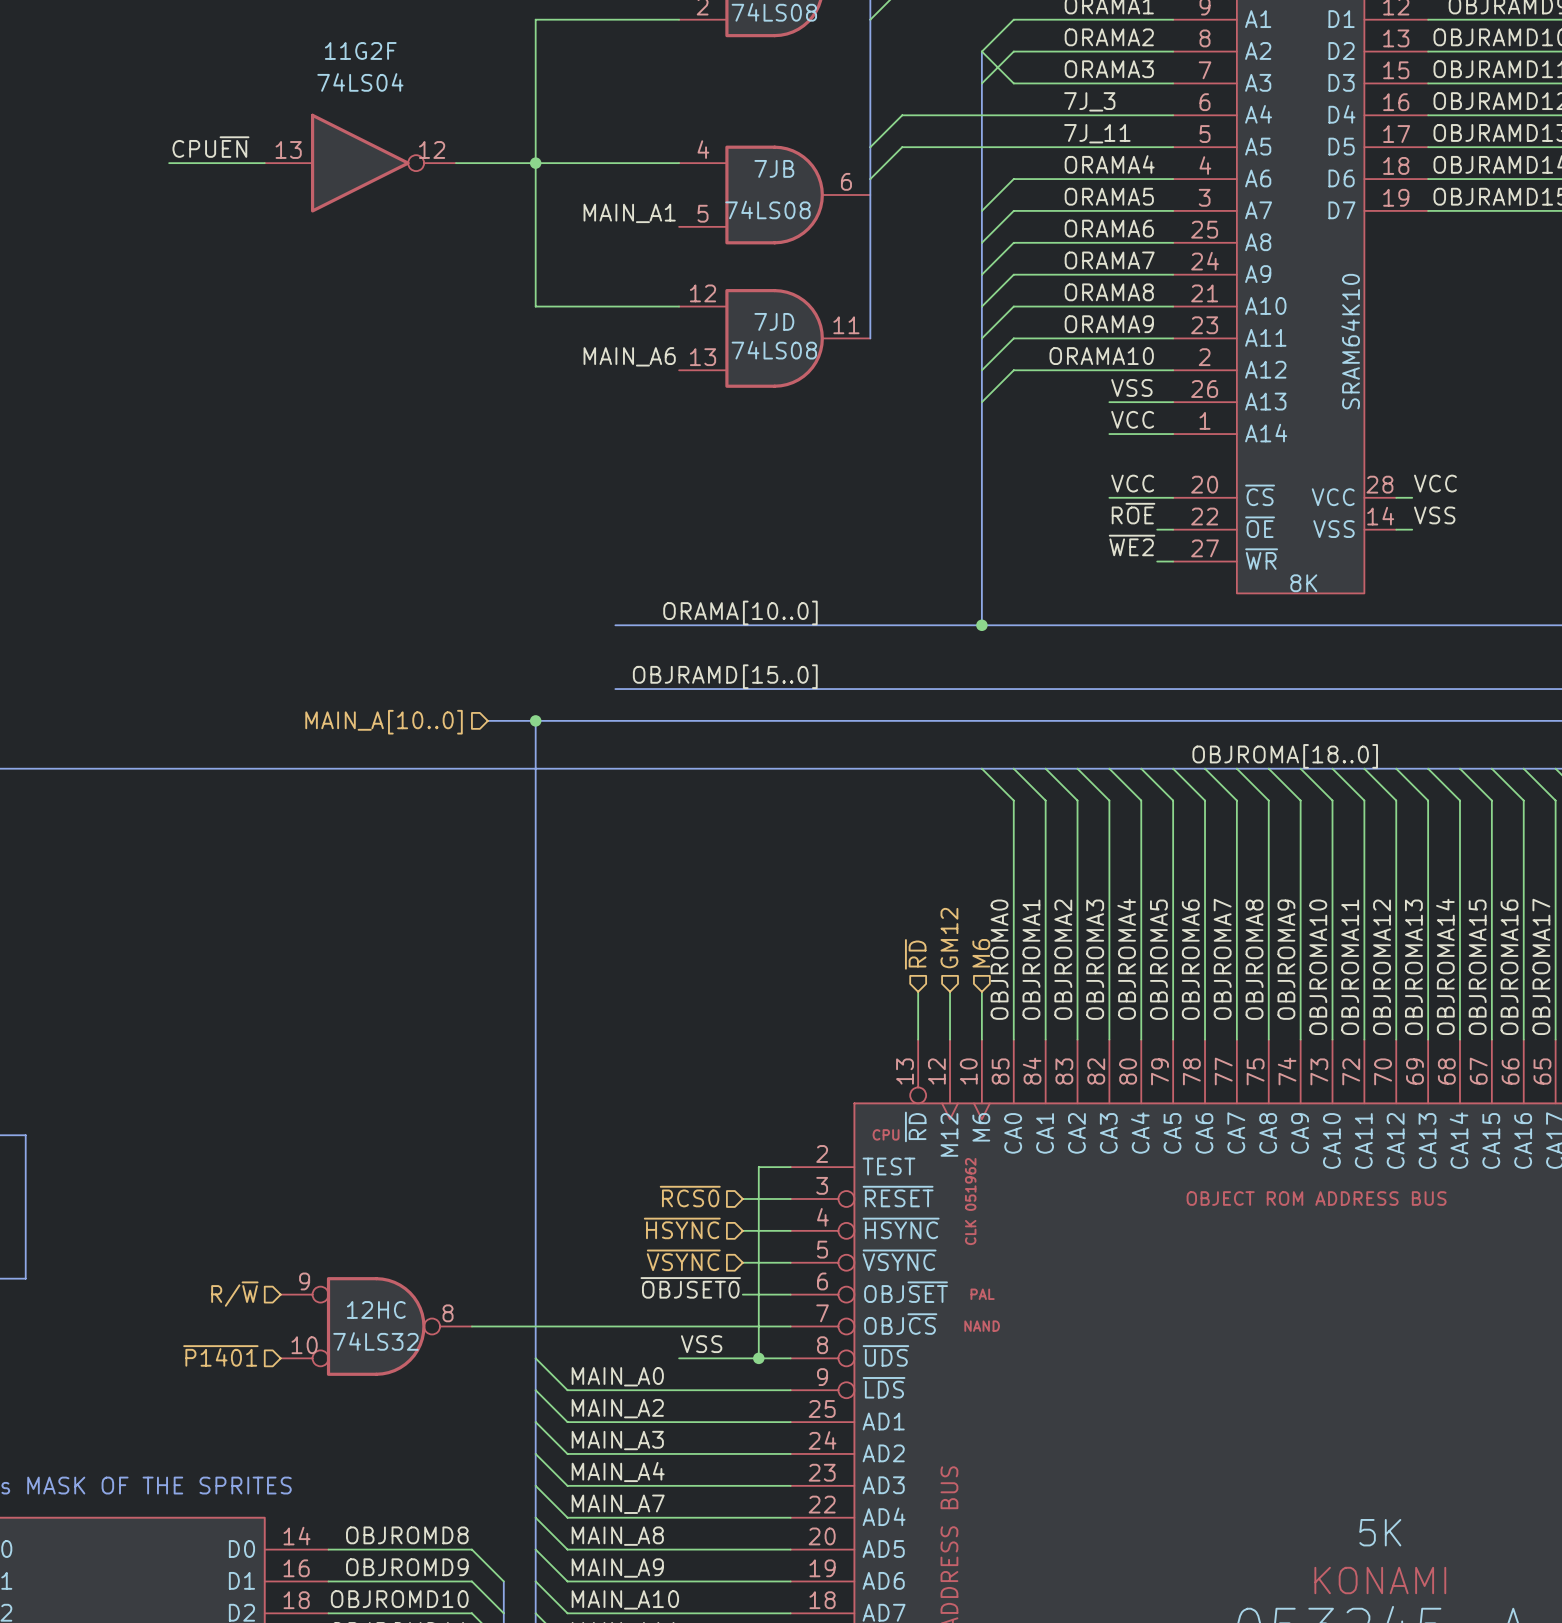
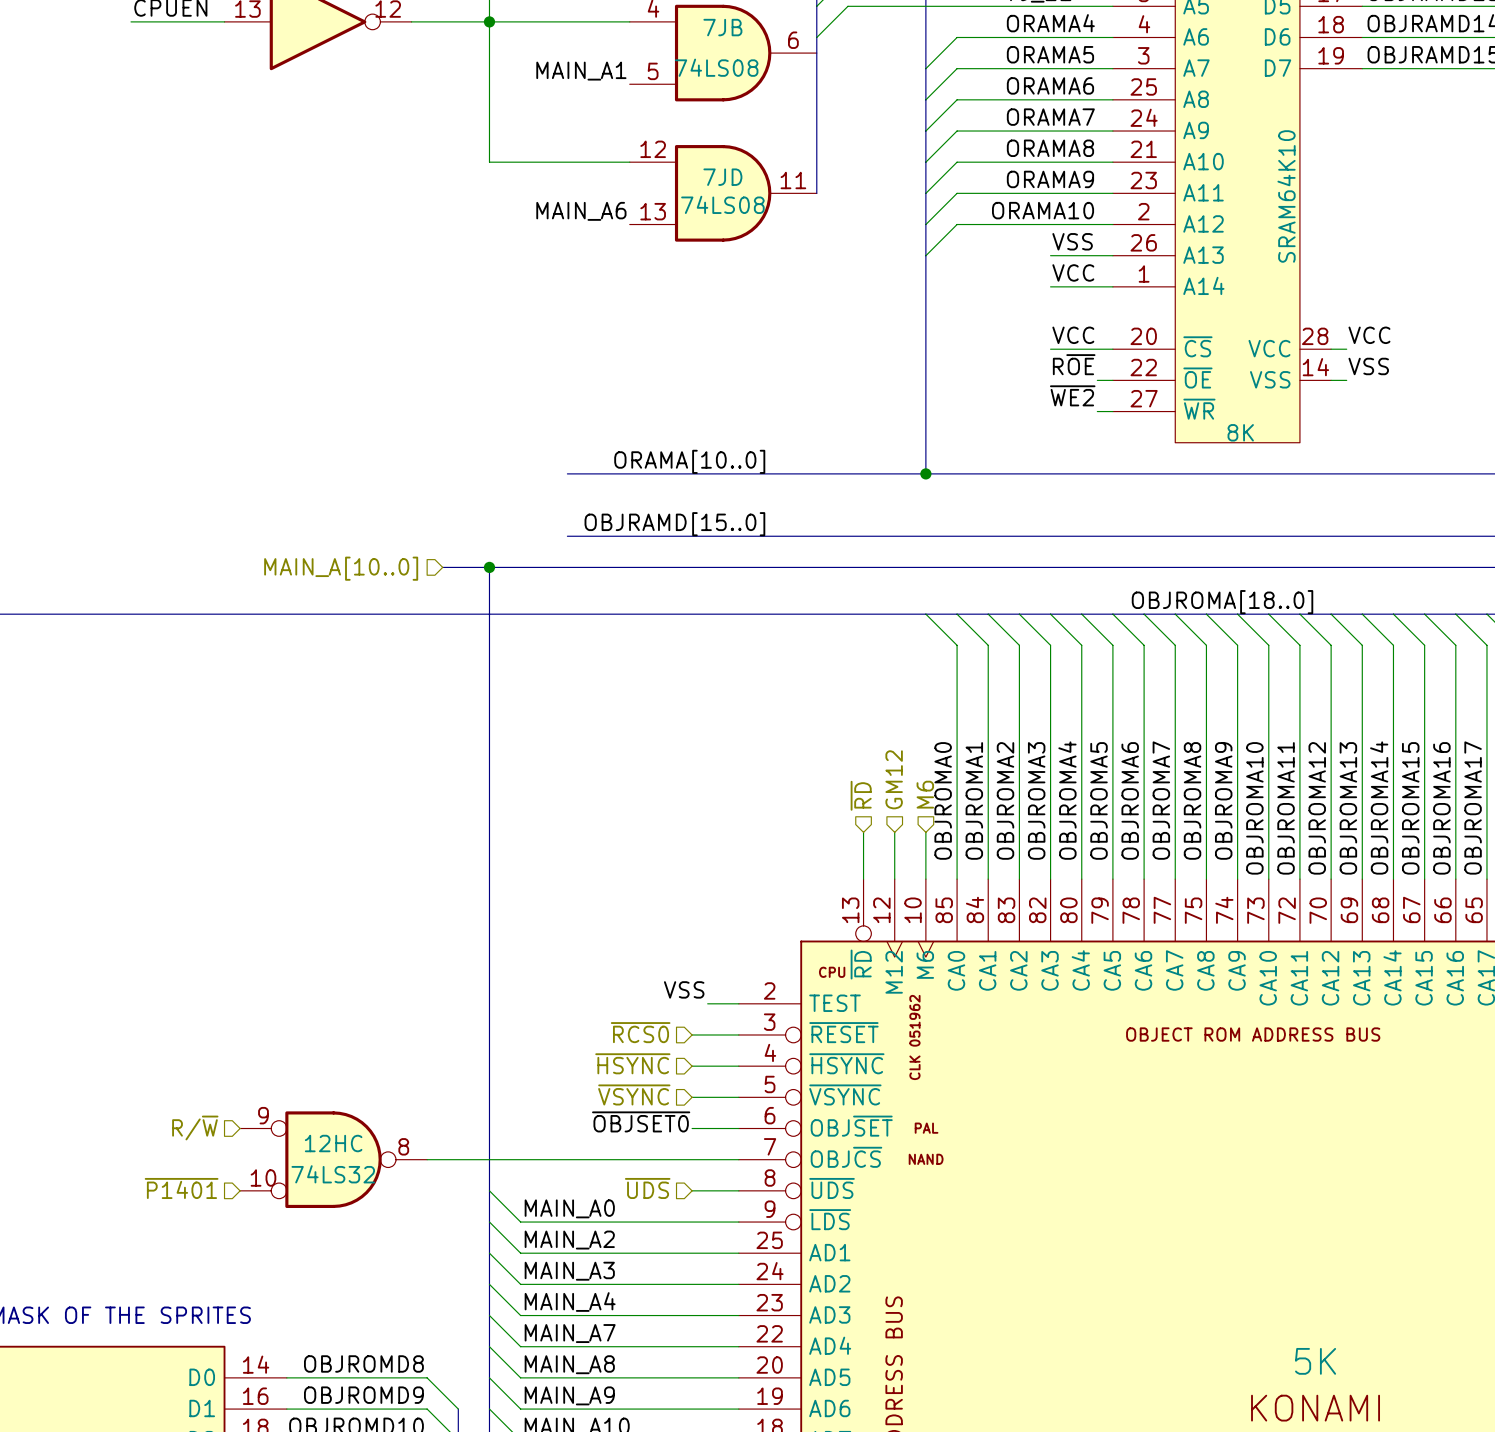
wire: (758, 1167) (758, 1358) -> none
label position: VSS (701, 1344) -> VSS (684, 989)
hierarchical label: none -> ~{UDS} (647, 1188)
wire: (679, 1358) (742, 1358) -> none
junction: (758, 1358) -> none

